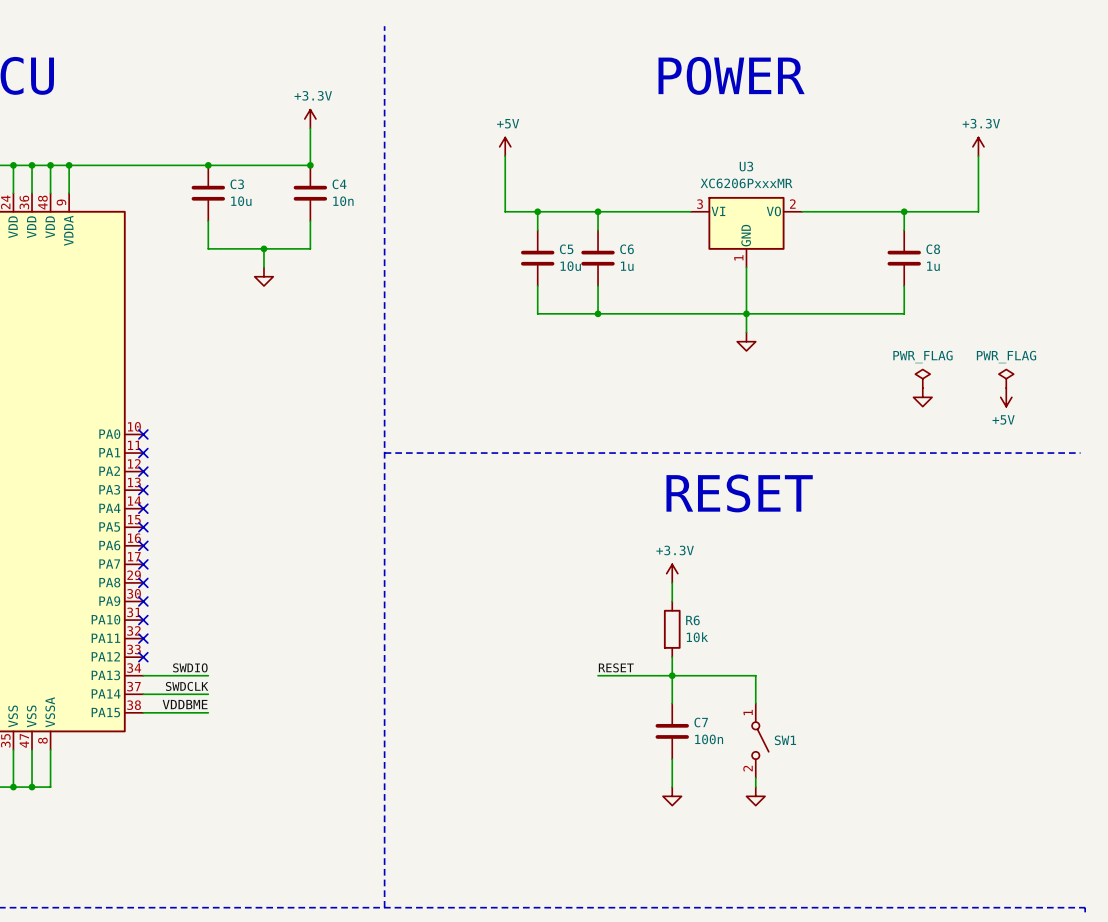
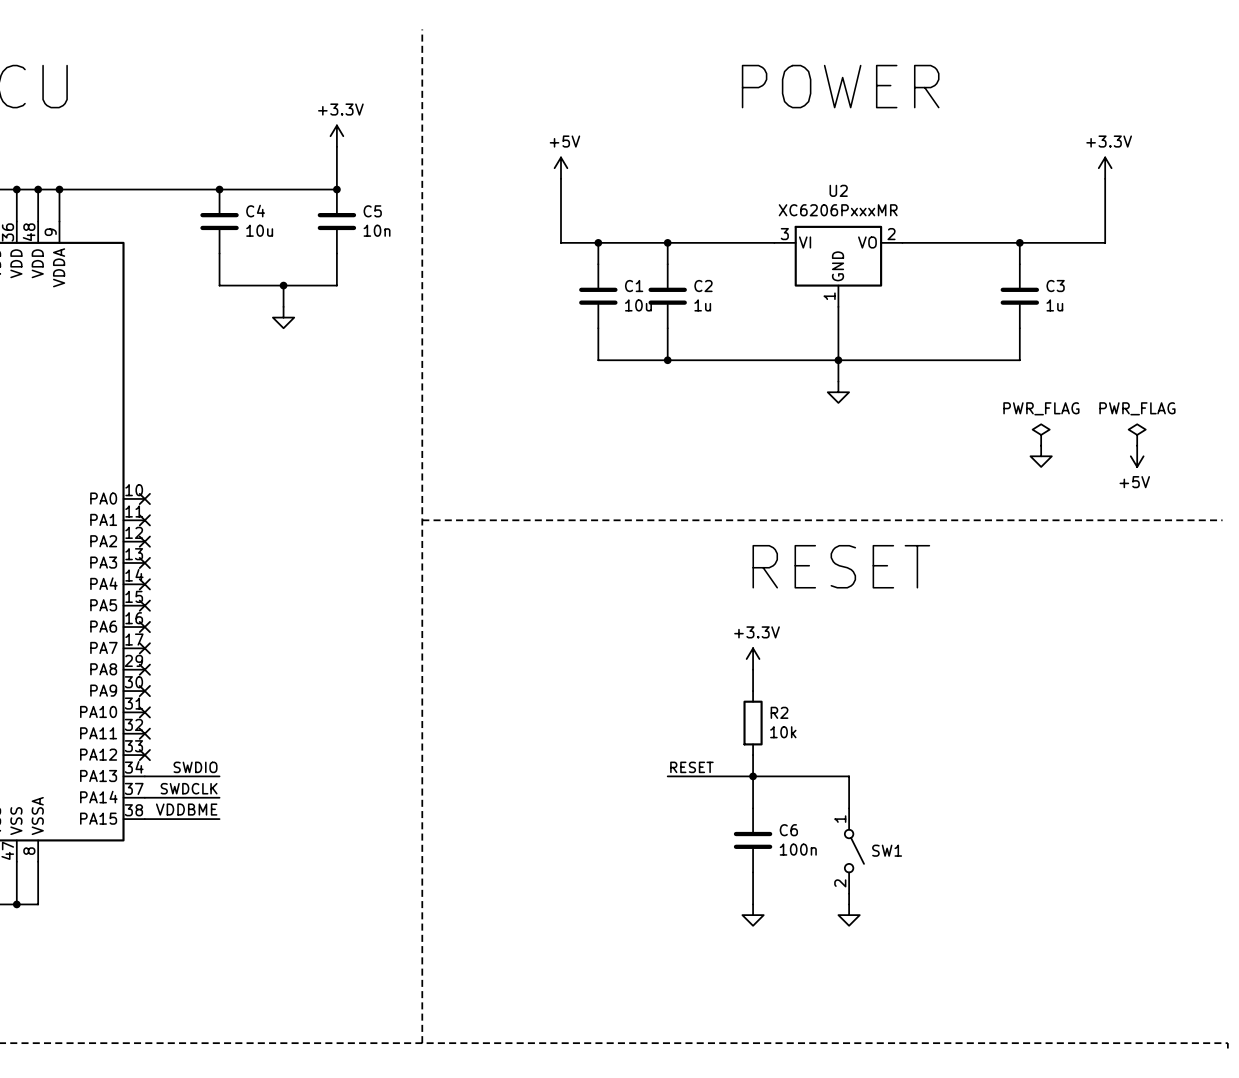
U3 name: U3 (746, 166) -> U2 (838, 190)
C3 name: C3 (237, 184) -> C4 (255, 211)
C4 name: C4 (339, 184) -> C5 (372, 211)
C5 name: C5 (566, 249) -> C1 (634, 286)
C6 name: C6 (627, 249) -> C2 (703, 286)
C8 name: C8 (933, 249) -> C3 (1055, 286)
R6 name: R6 (692, 620) -> R2 (779, 712)
C7 name: C7 (701, 722) -> C6 (788, 830)

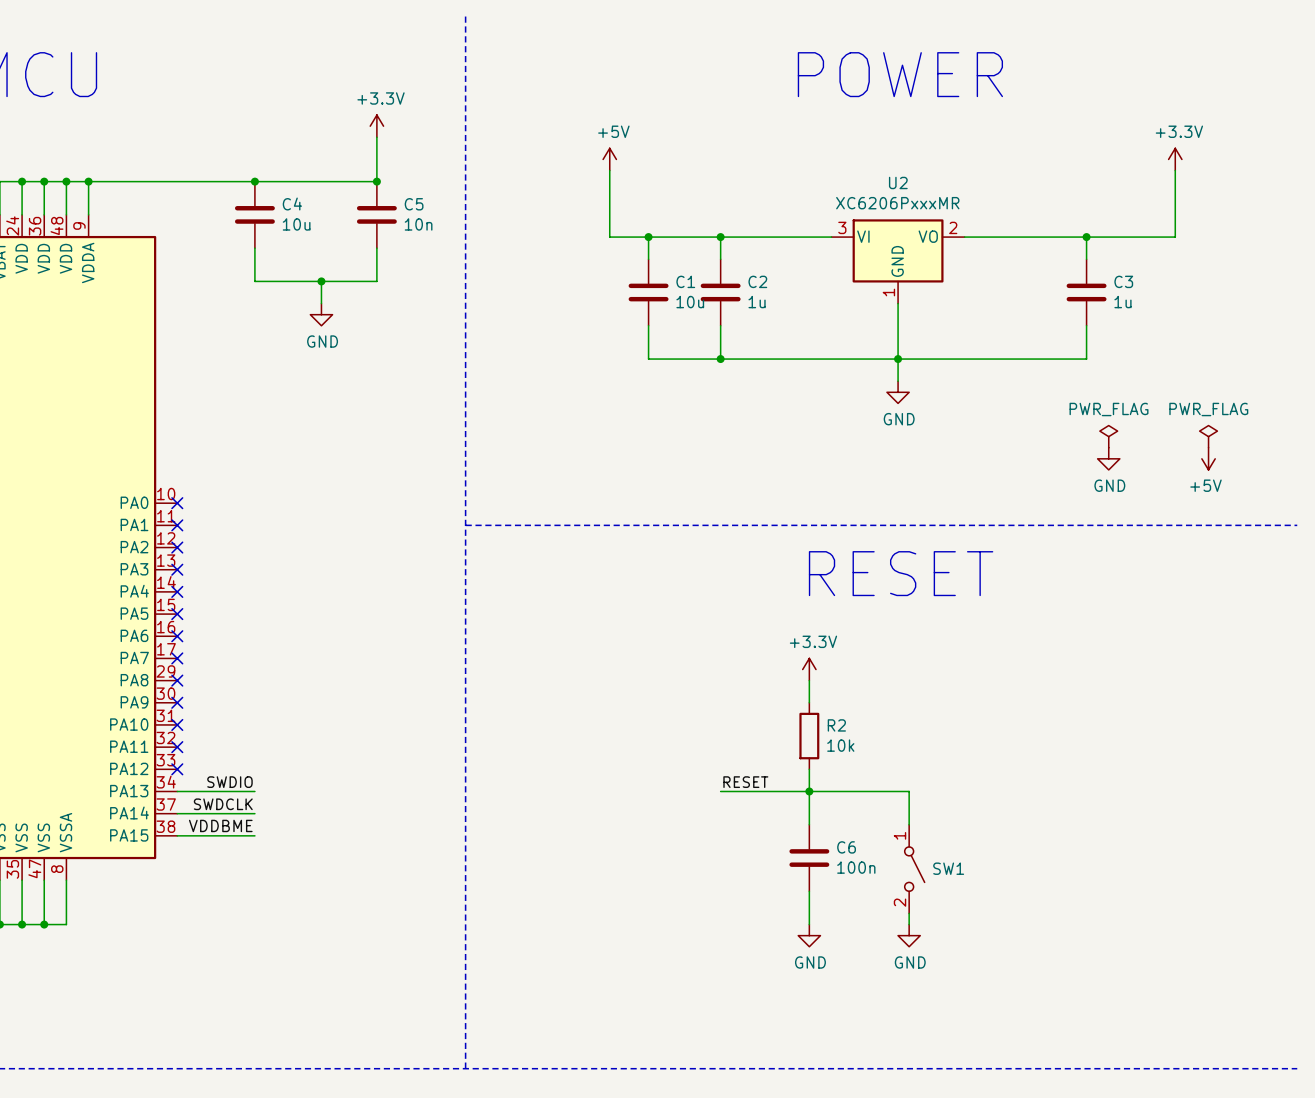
power symbol text: none -> GND (322, 341)
power symbol text: none -> GND (899, 419)
power symbol text: none -> GND (1109, 485)
power symbol text: none -> GND (810, 962)
power symbol text: none -> GND (910, 962)
line: (1222, 1043) (1227, 1043) (1227, 1048) -> none

